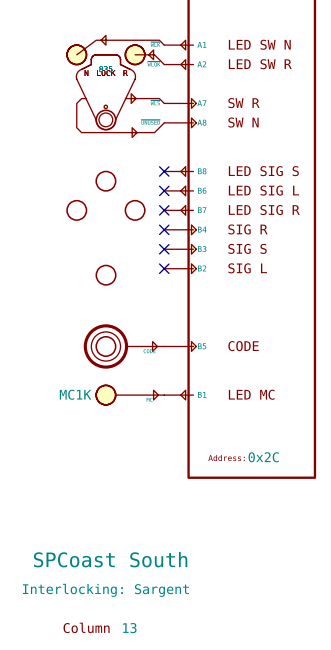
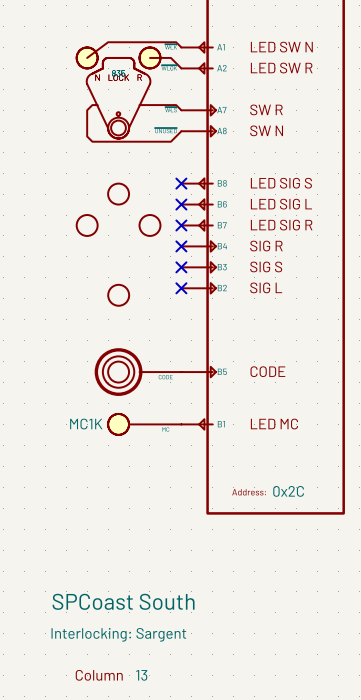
part symbol: [66, 35, 165, 70] -> [75, 42, 182, 74]
part symbol: [76, 54, 165, 138] -> [86, 57, 182, 142]
part symbol: [83, 324, 165, 369] -> [94, 348, 182, 396]
part symbol: [95, 384, 165, 406] -> [107, 413, 182, 436]

